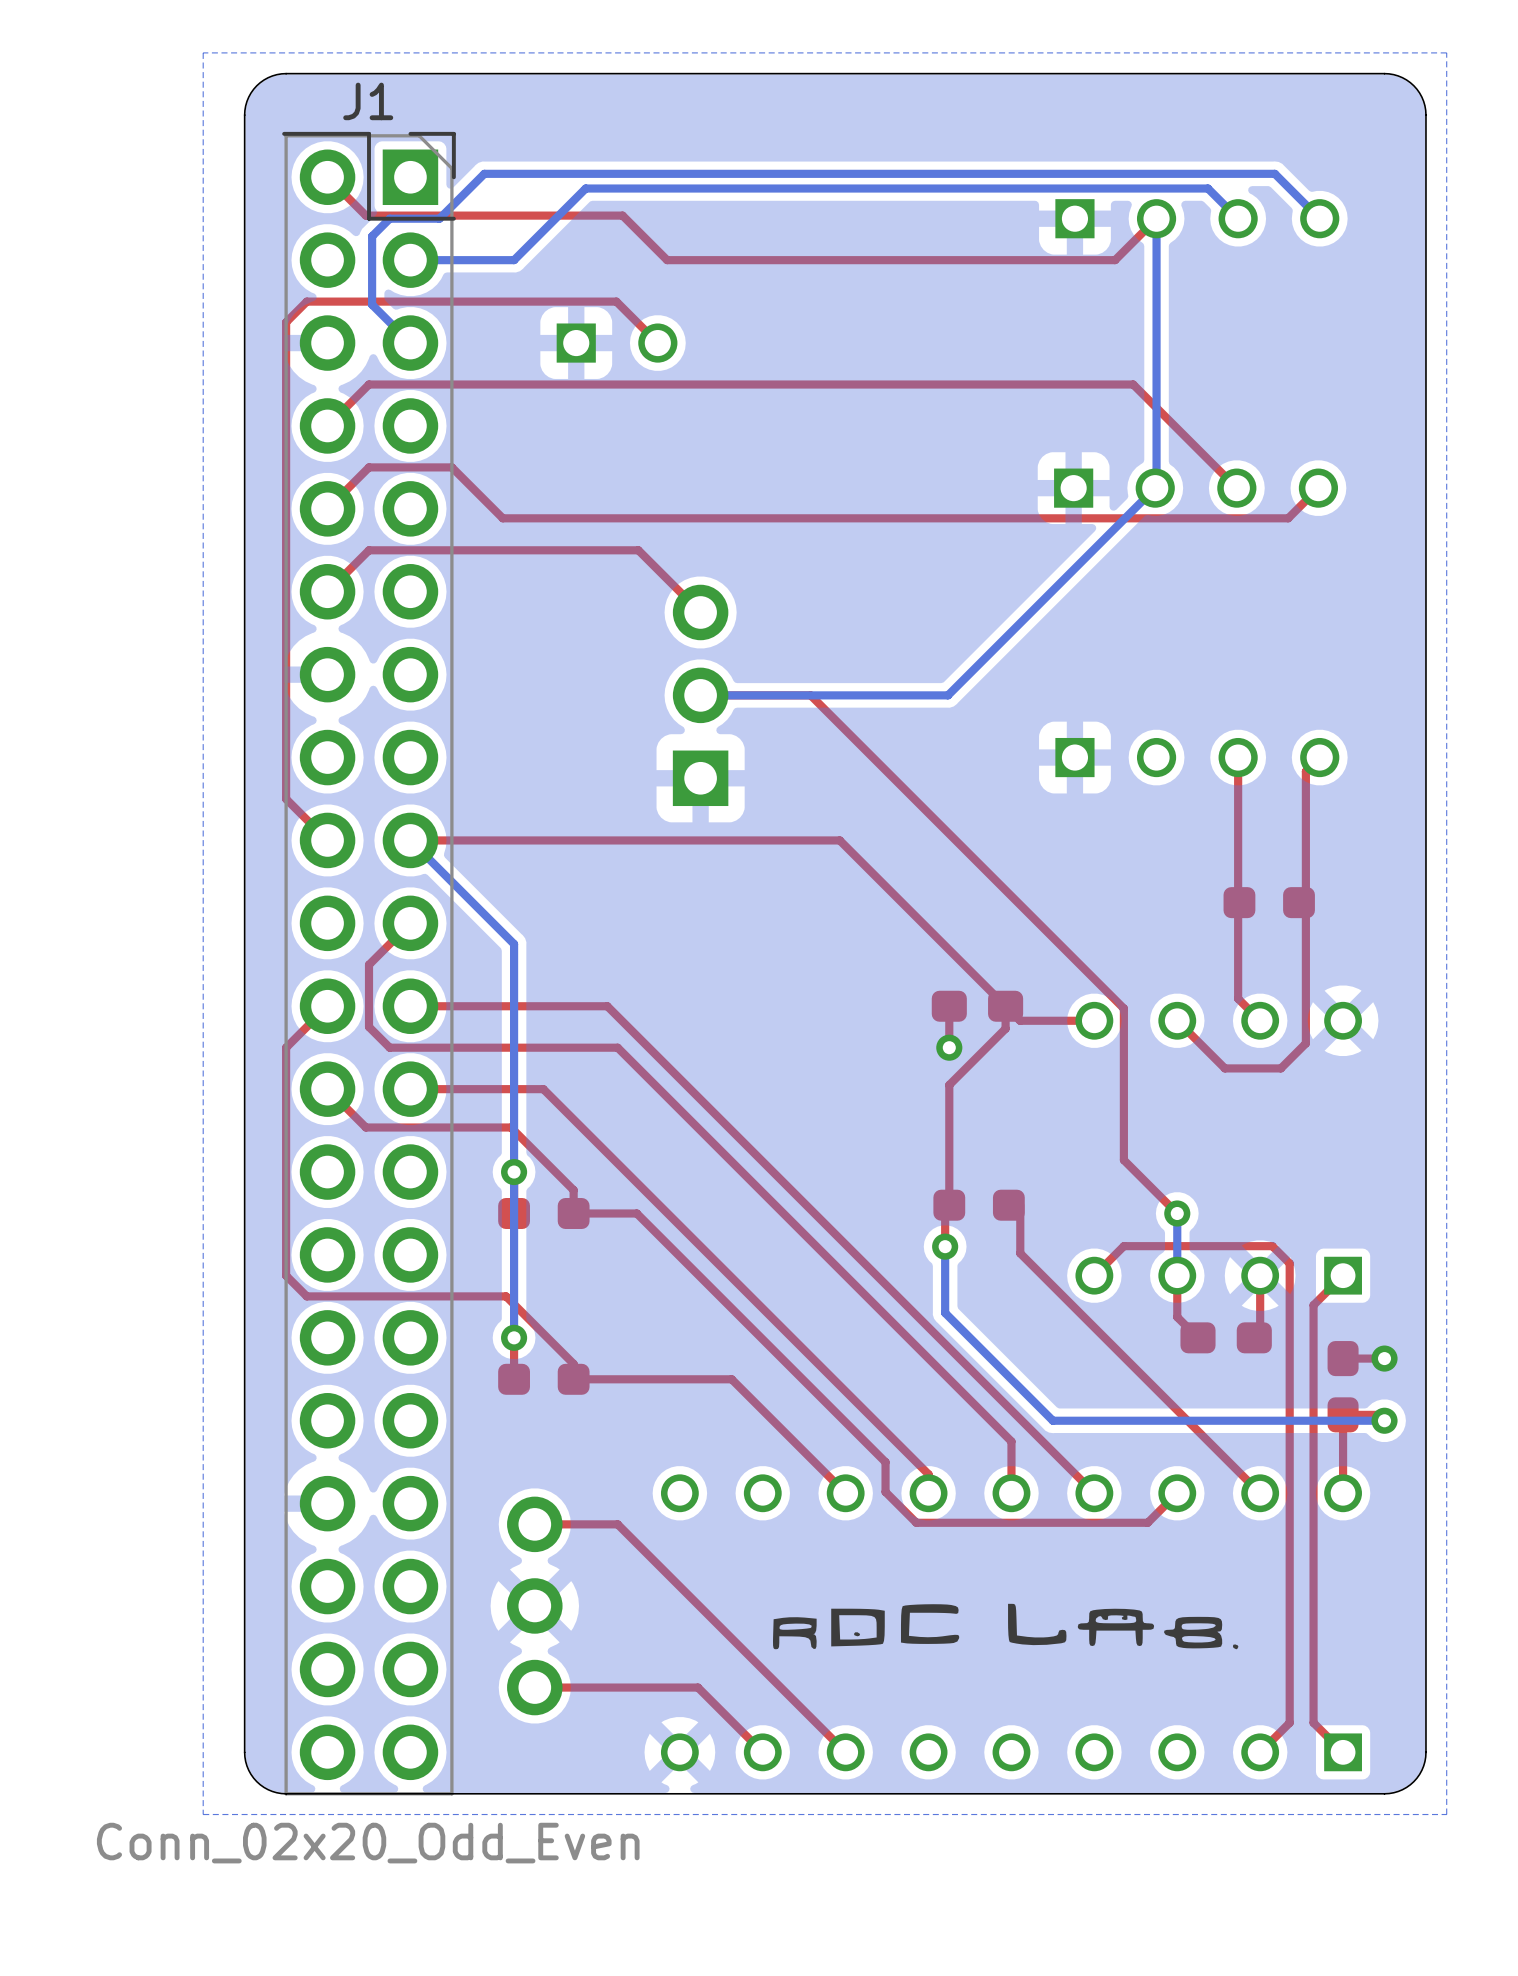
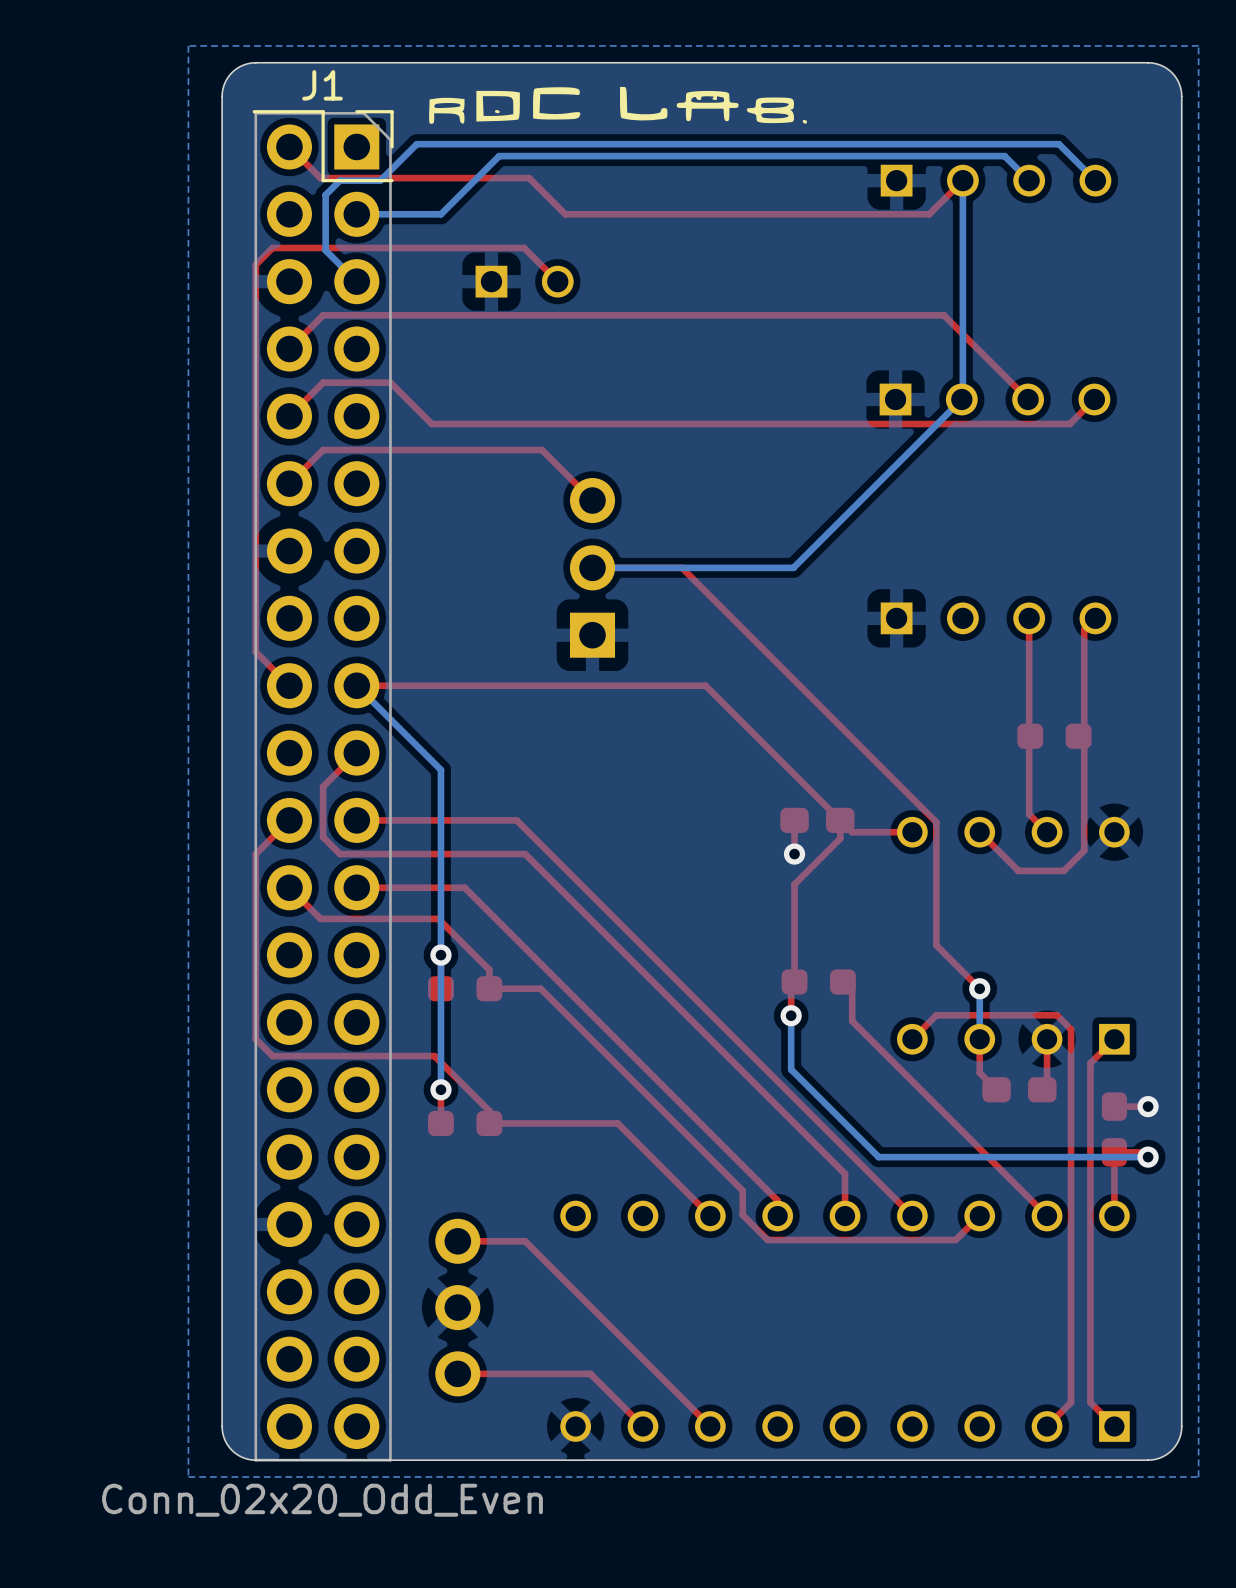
drawing: none -> [429, 86, 808, 124]
drawing: [772, 1603, 1239, 1650] -> none

